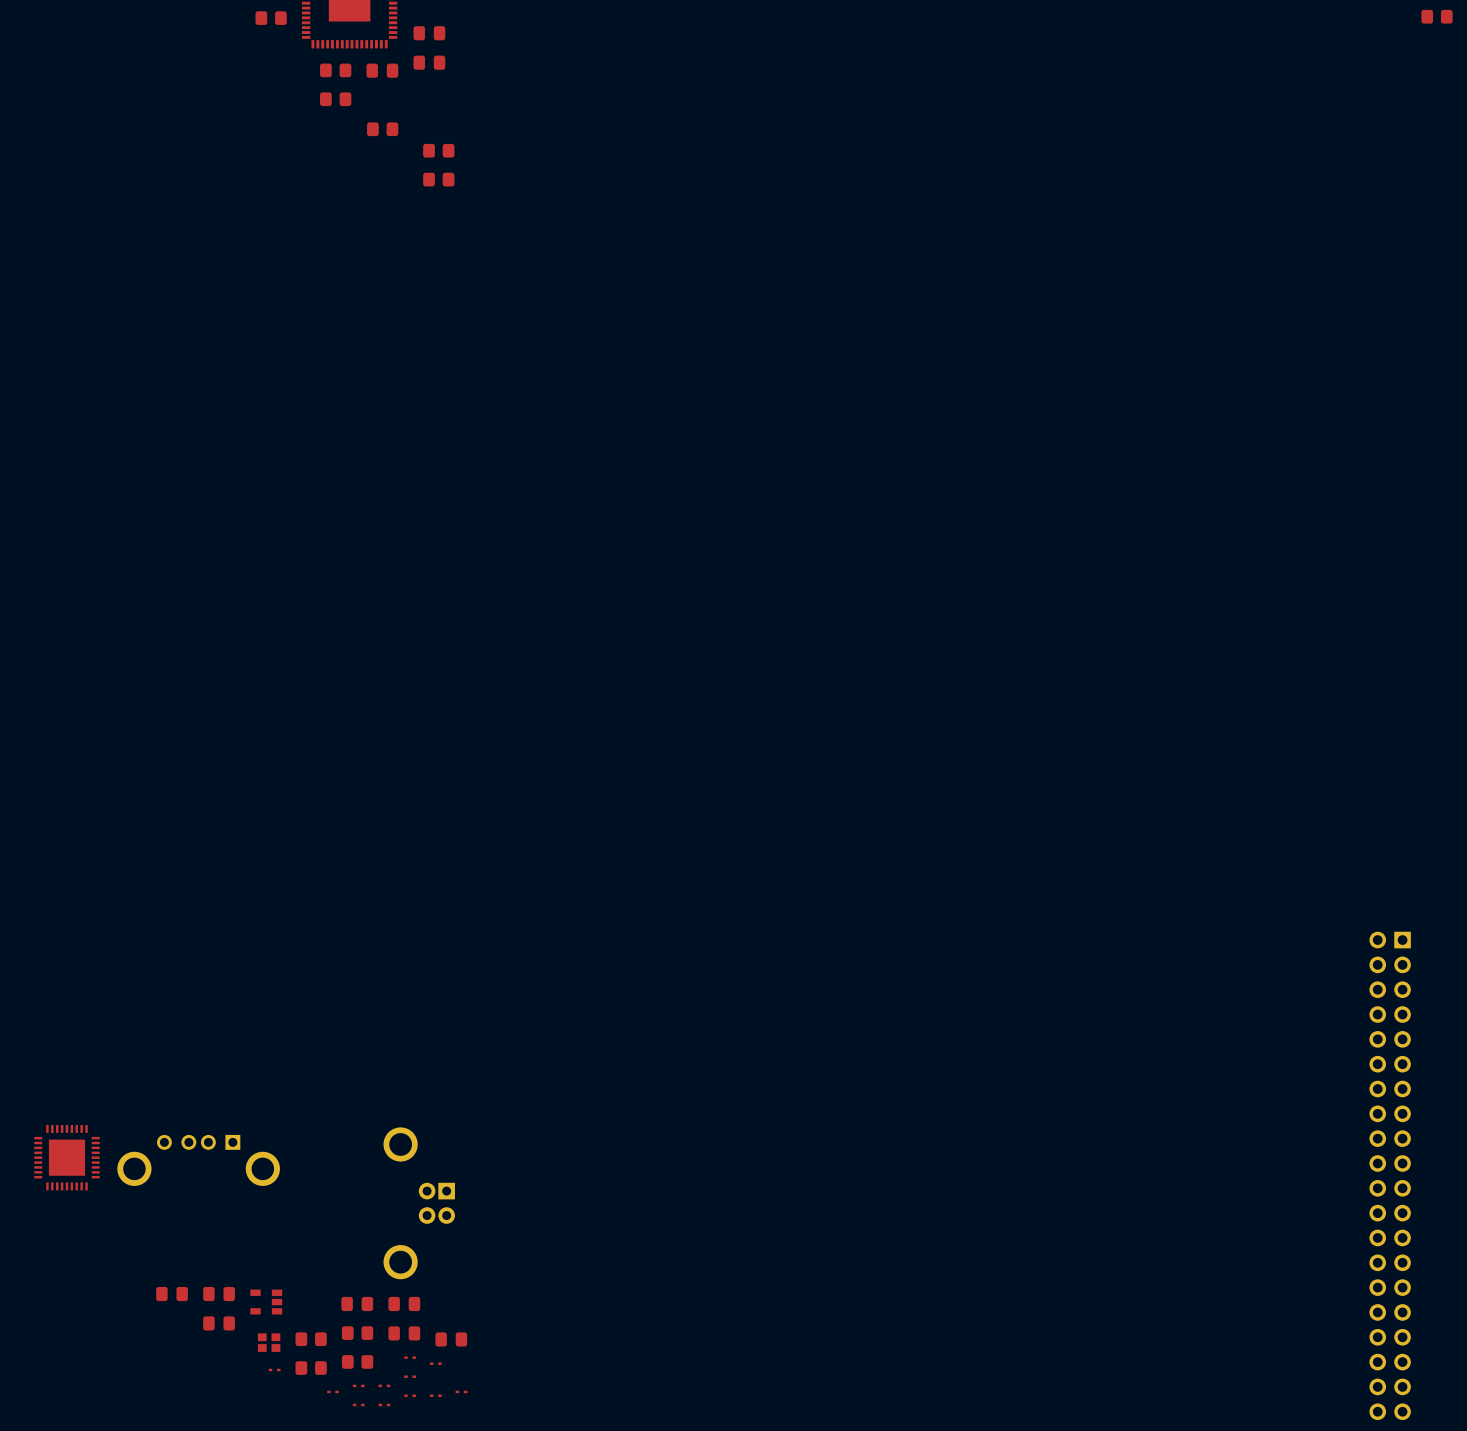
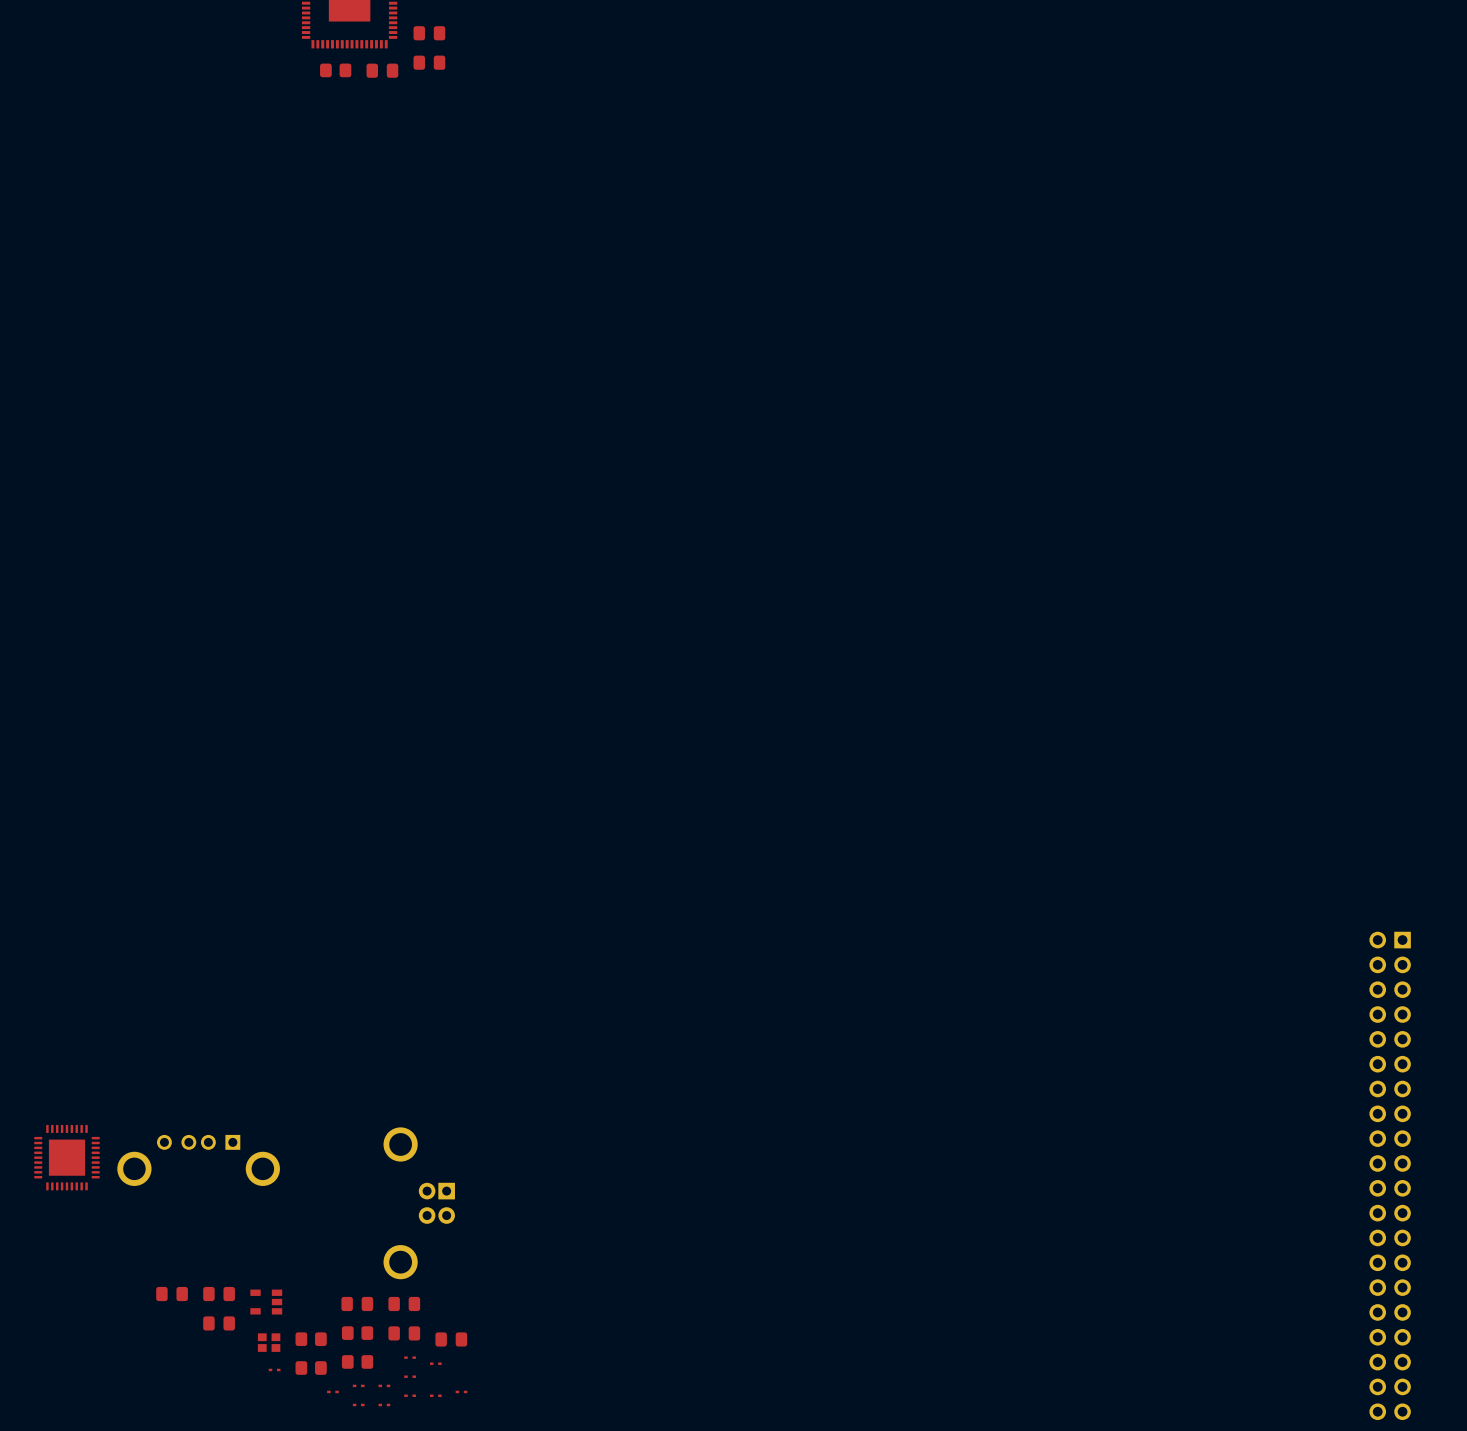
part: (1437, 16) -> none
part: (271, 18) -> none
part: (335, 99) -> none
part: (382, 129) -> none
part: (438, 150) -> none
part: (438, 179) -> none

